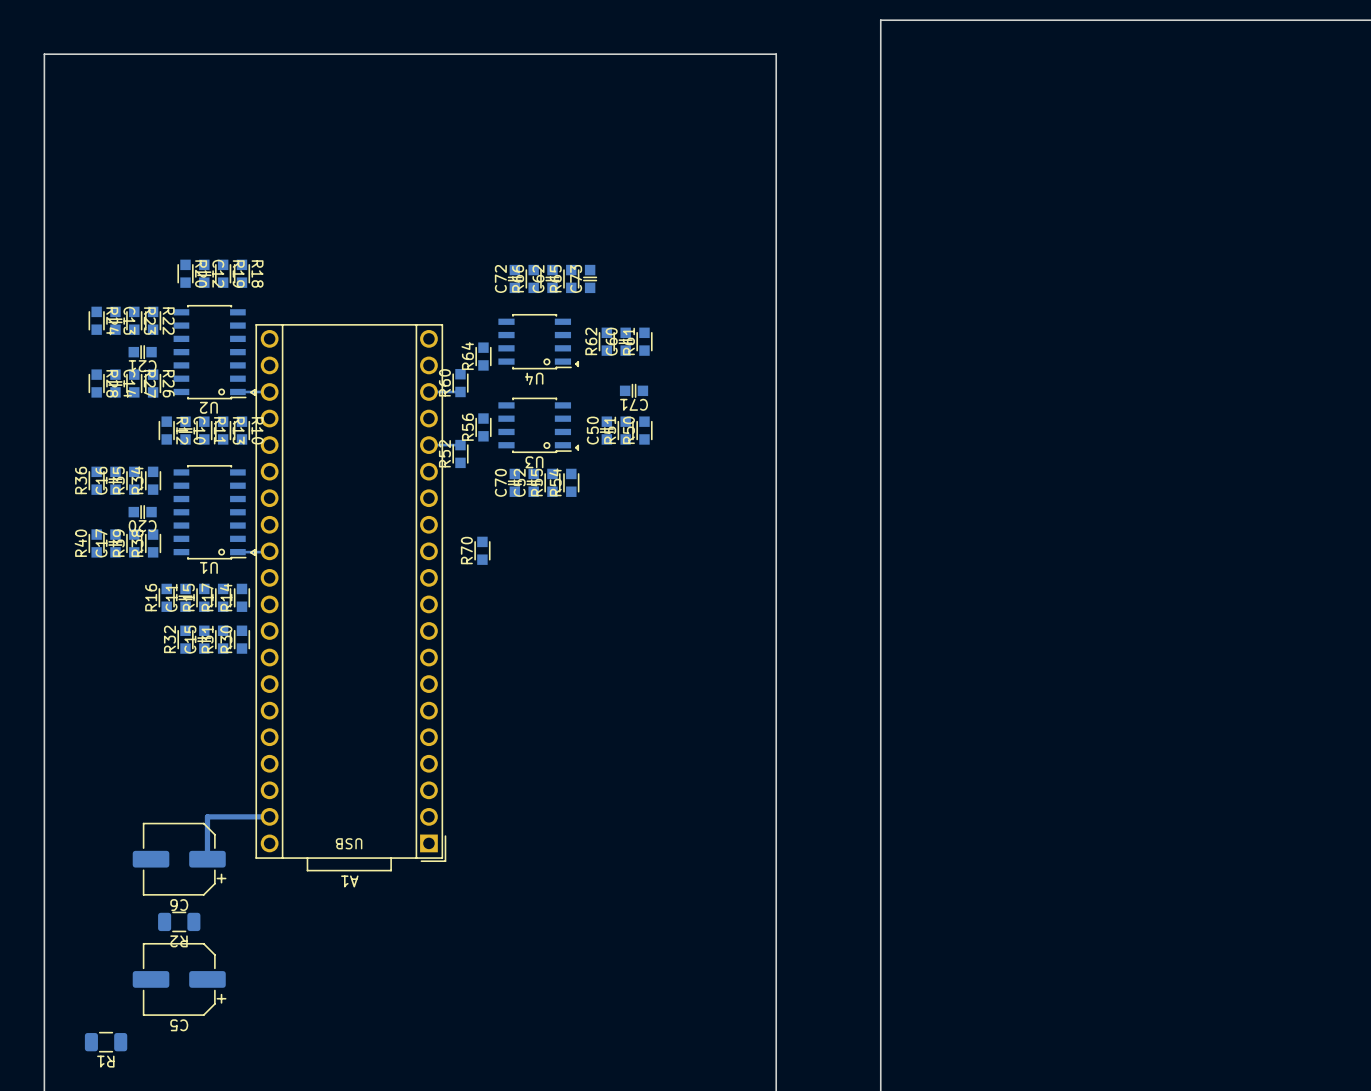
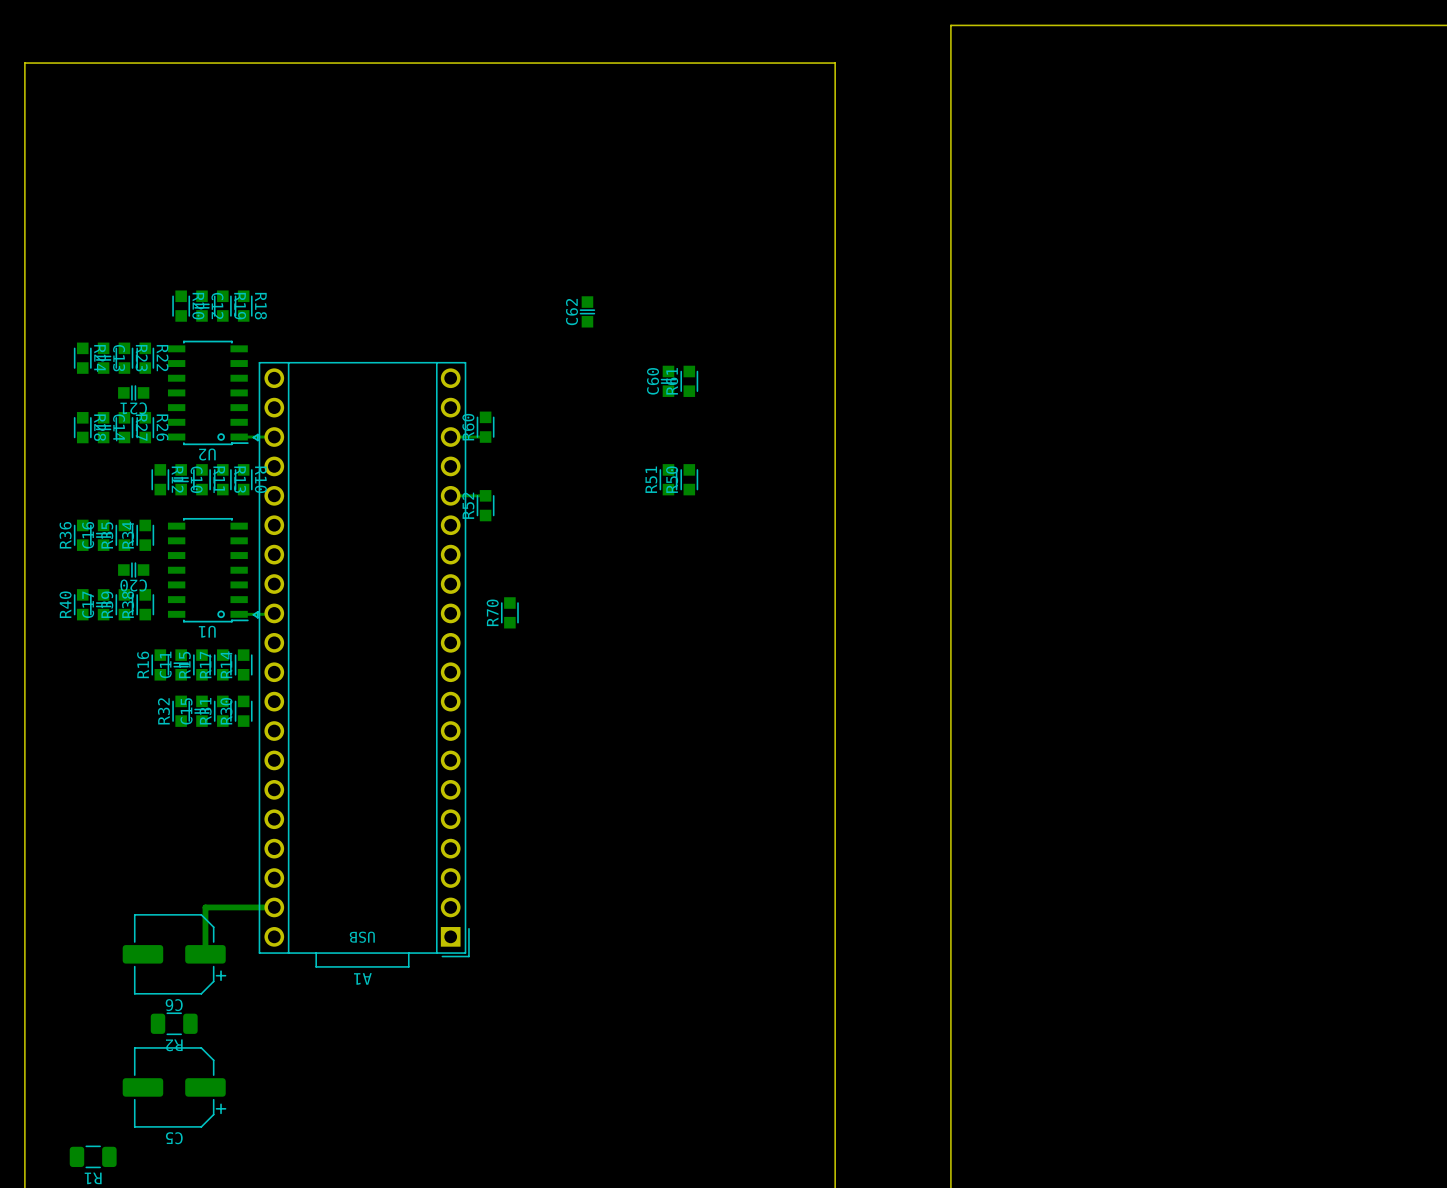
C72: (514, 278) -> none
R66: (533, 278) -> none
R65: (571, 278) -> none
C73: (590, 278) -> none
U4: (538, 341) -> none
R62: (606, 341) -> none
R64: (483, 356) -> none
C71: (634, 390) -> none
U3: (538, 425) -> none
R56: (483, 427) -> none
C50: (606, 430) -> none
C70: (514, 482) -> none
C52: (533, 482) -> none
R55: (552, 482) -> none
R54: (571, 482) -> none

